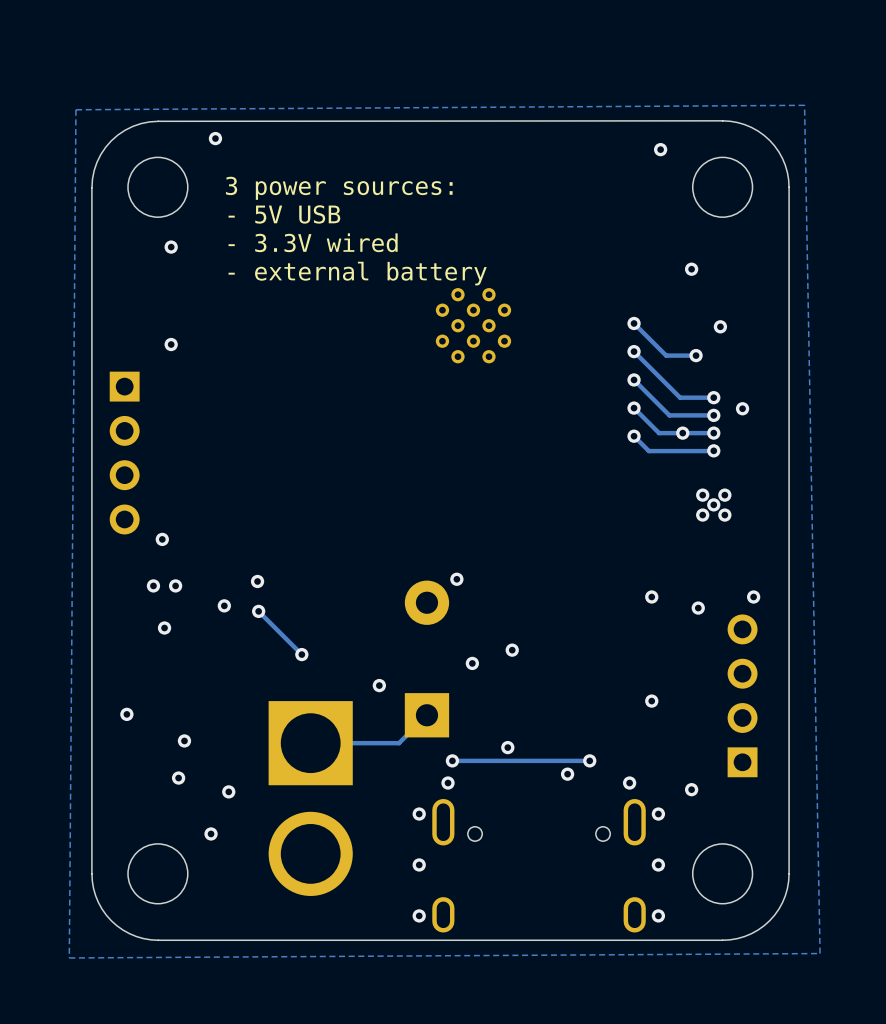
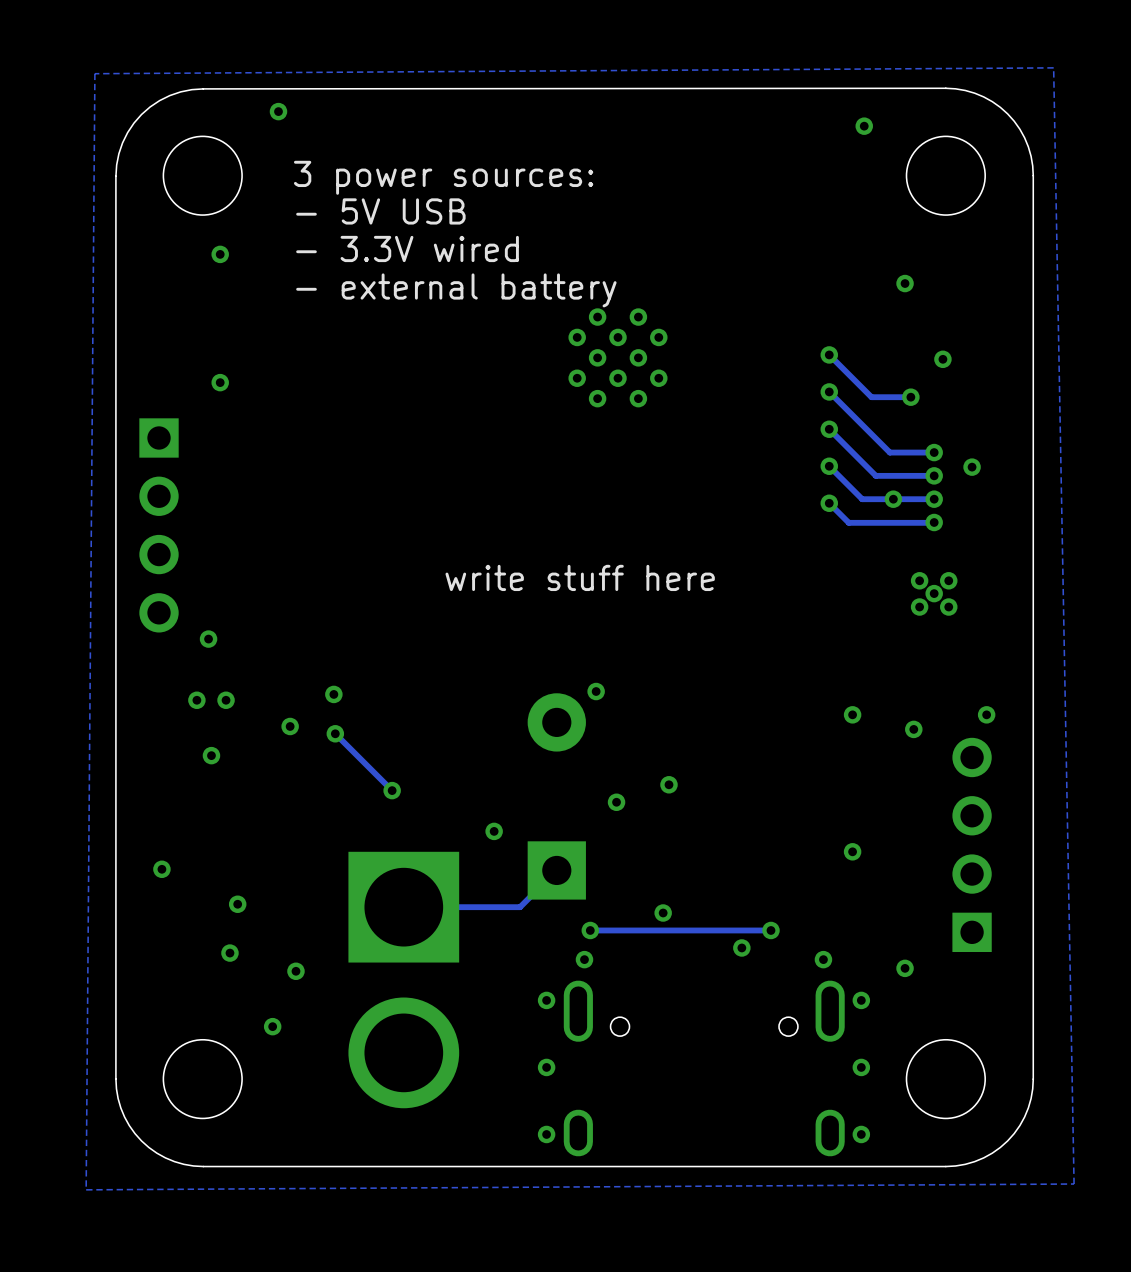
text: none -> write stuff here (580, 577)

